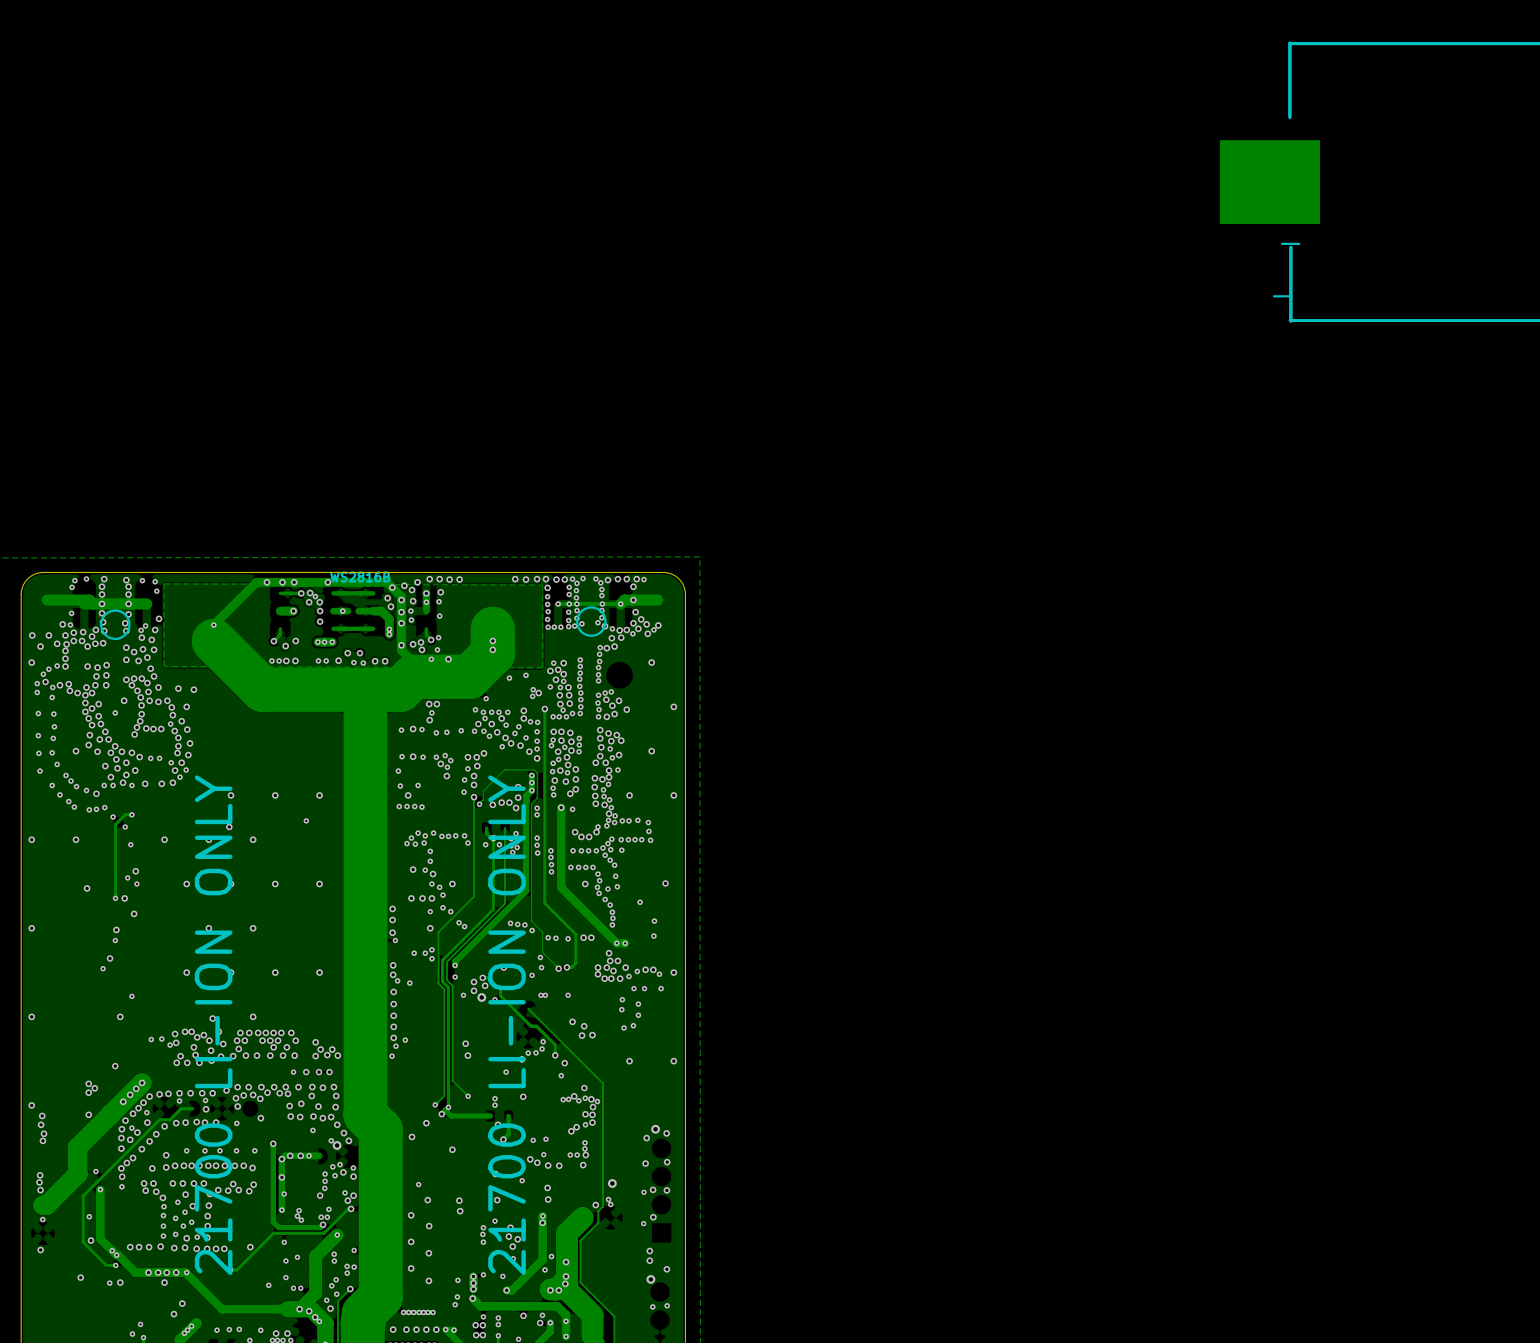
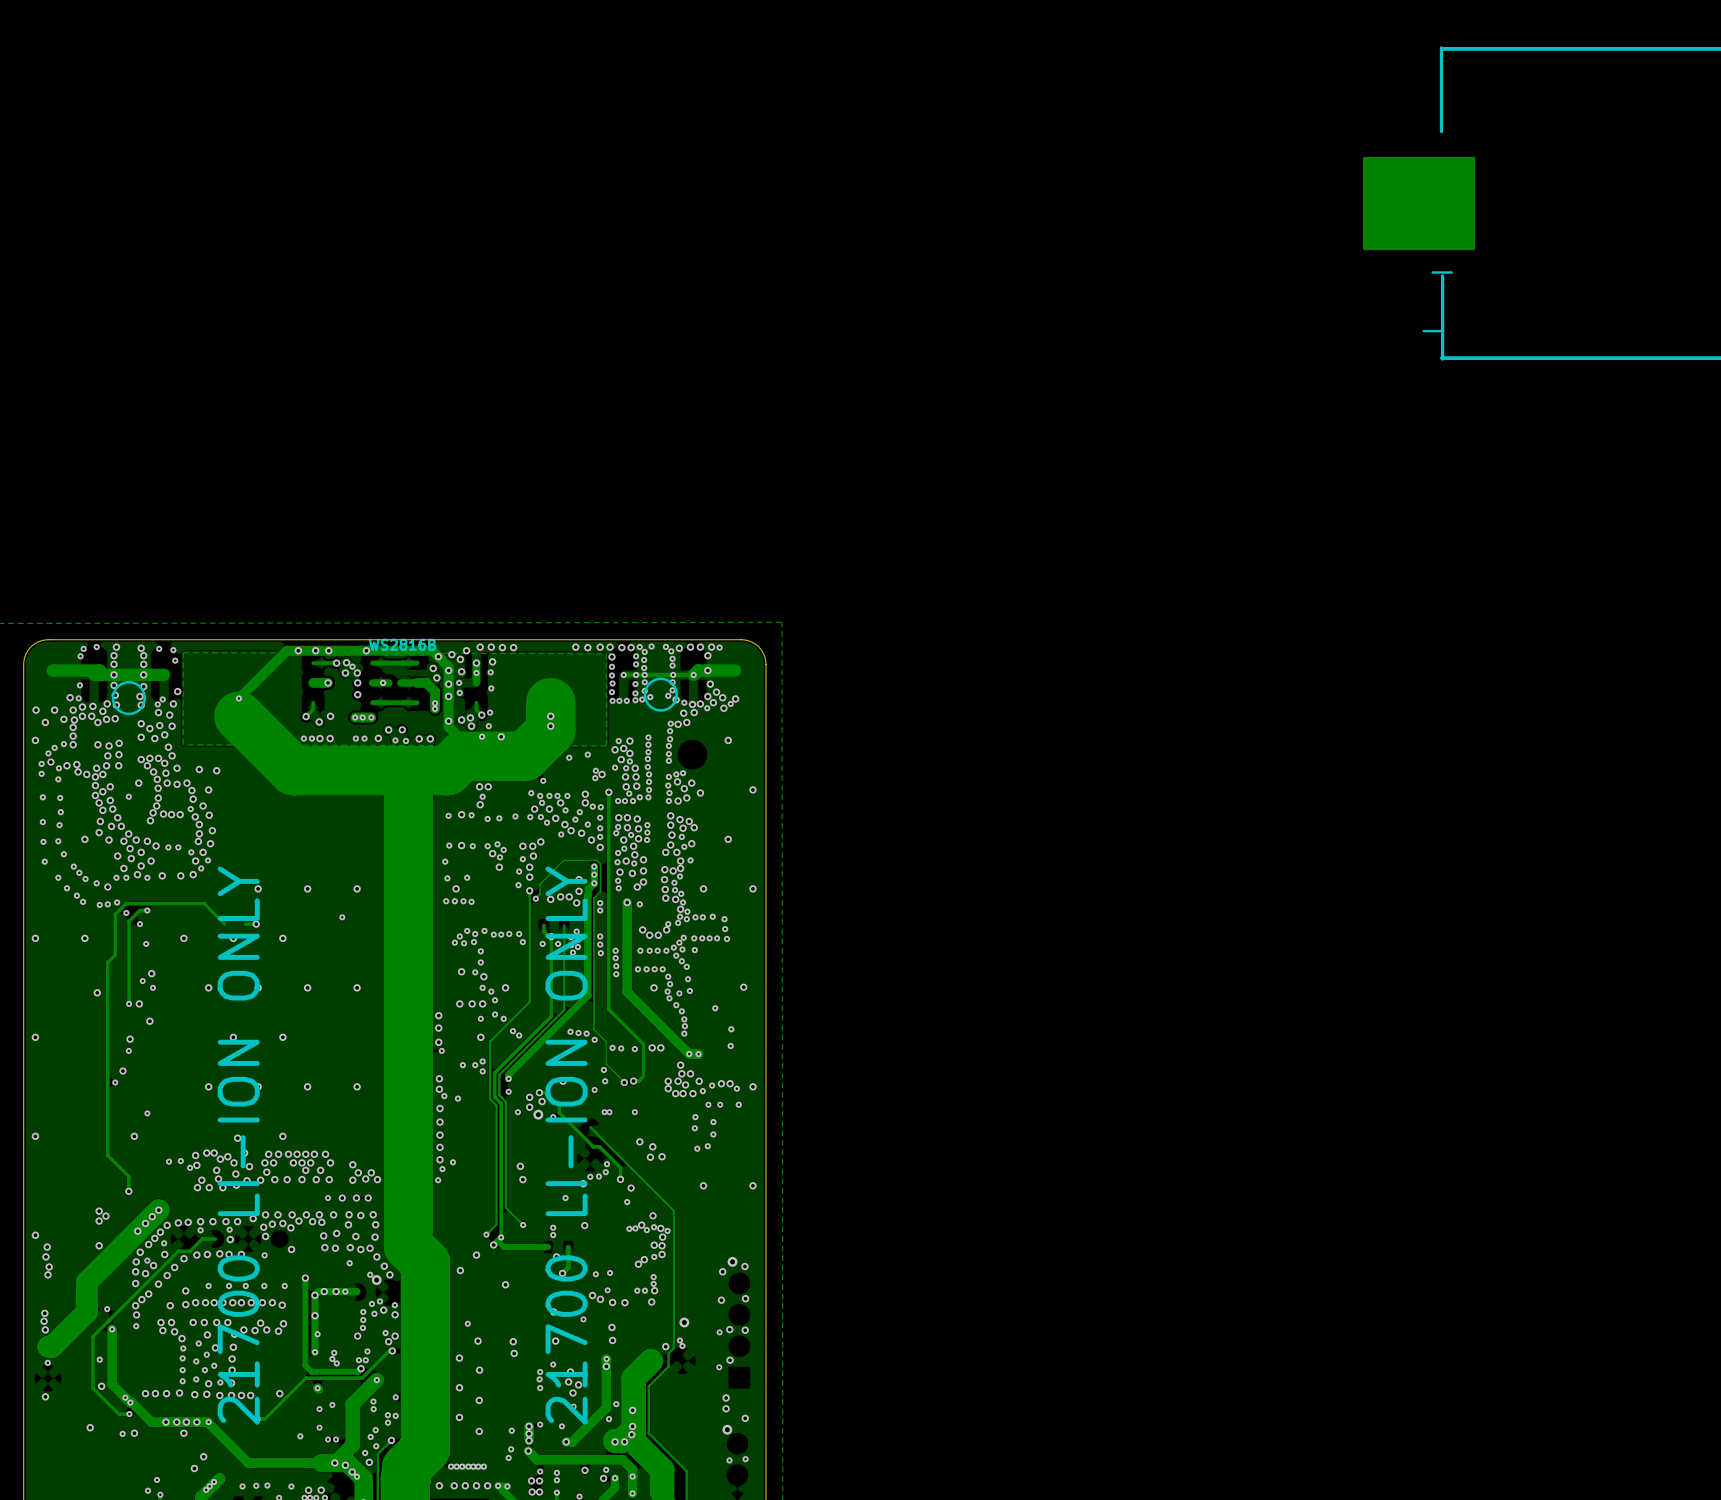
track: none -> (224, 924) (204, 903) (126, 903) (115, 914) (115, 955) (107, 962) (107, 1155) (128, 1176) (128, 1191)
track: none -> (256, 924) (245, 924)
track: none -> (317, 1388) (318, 1389)

